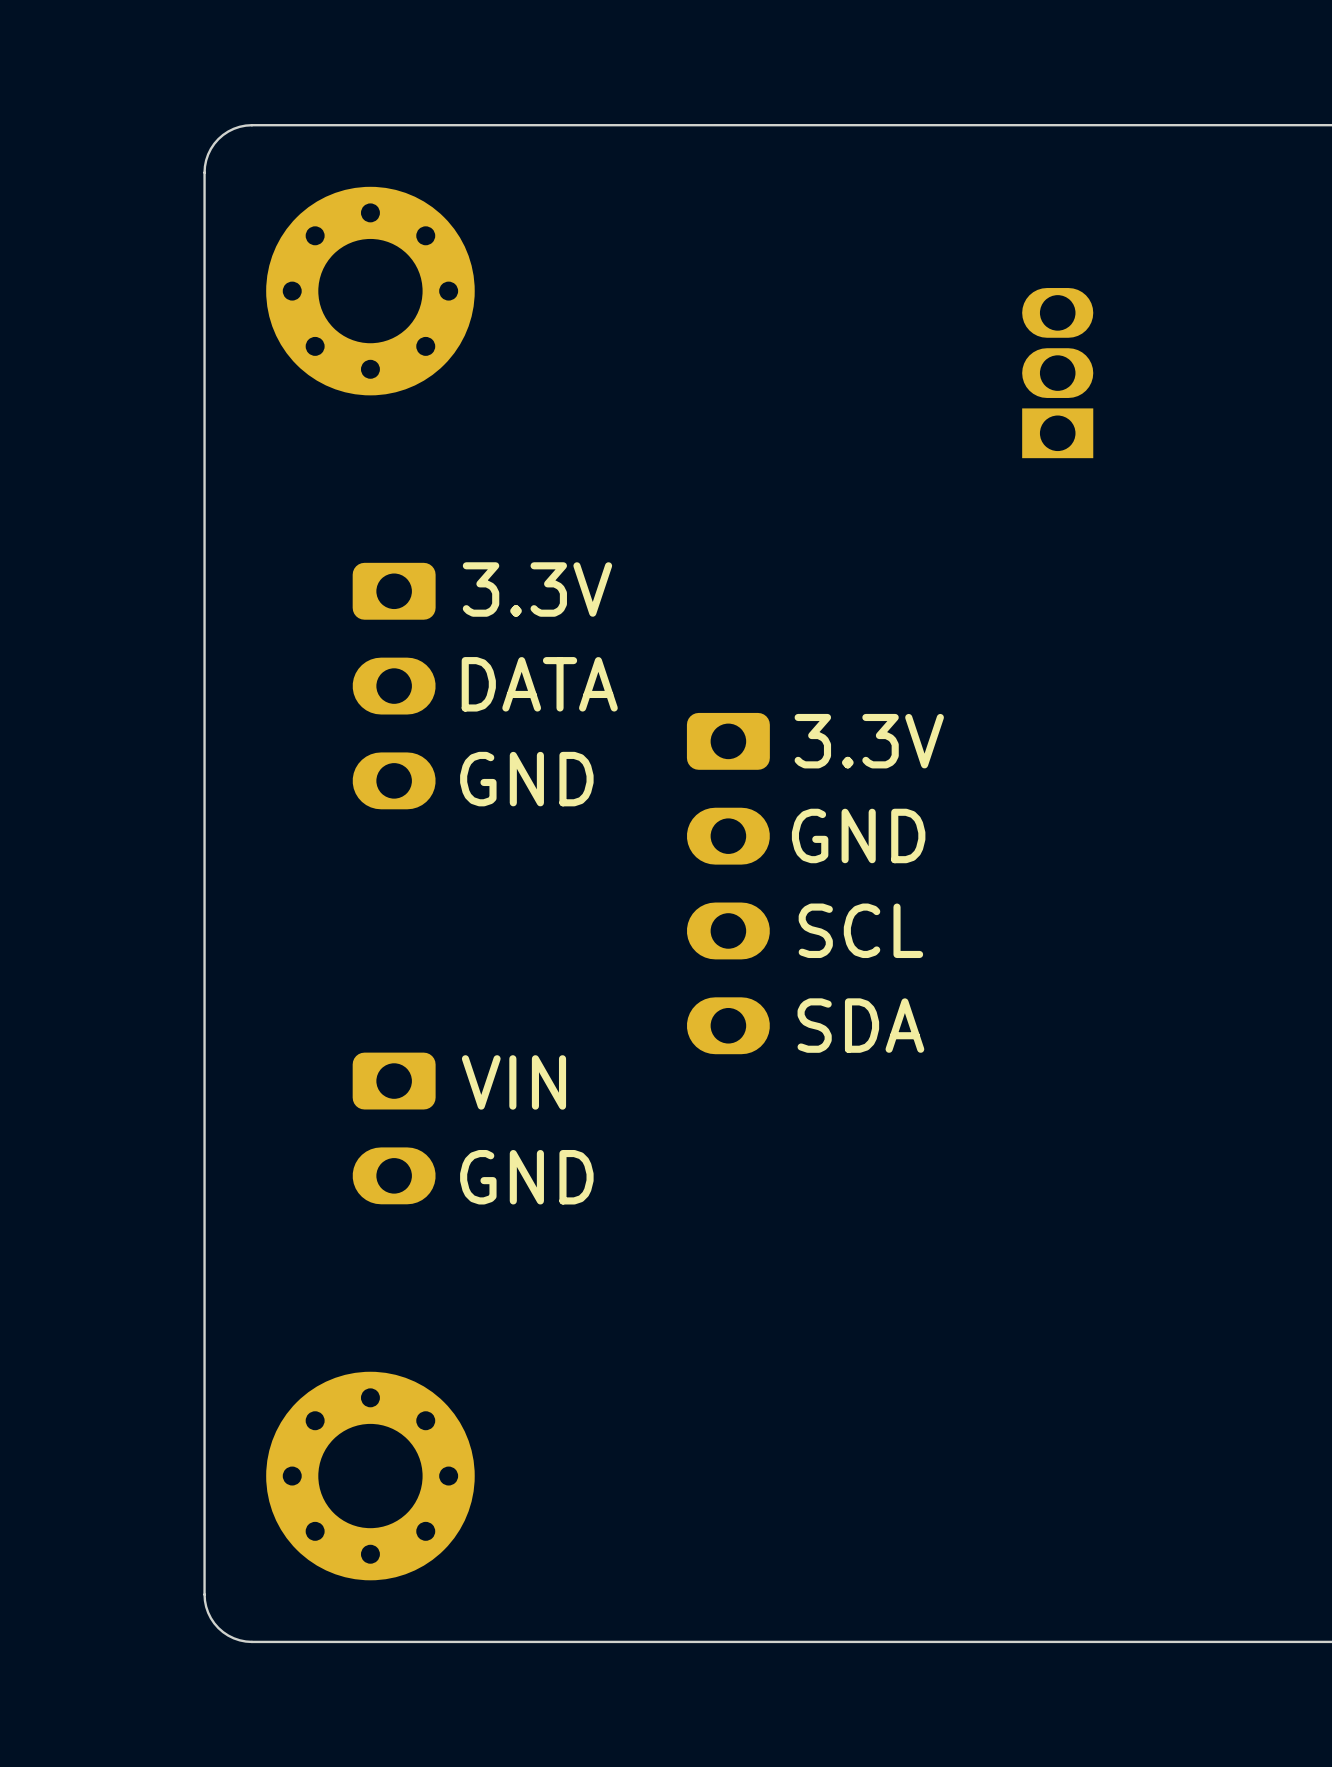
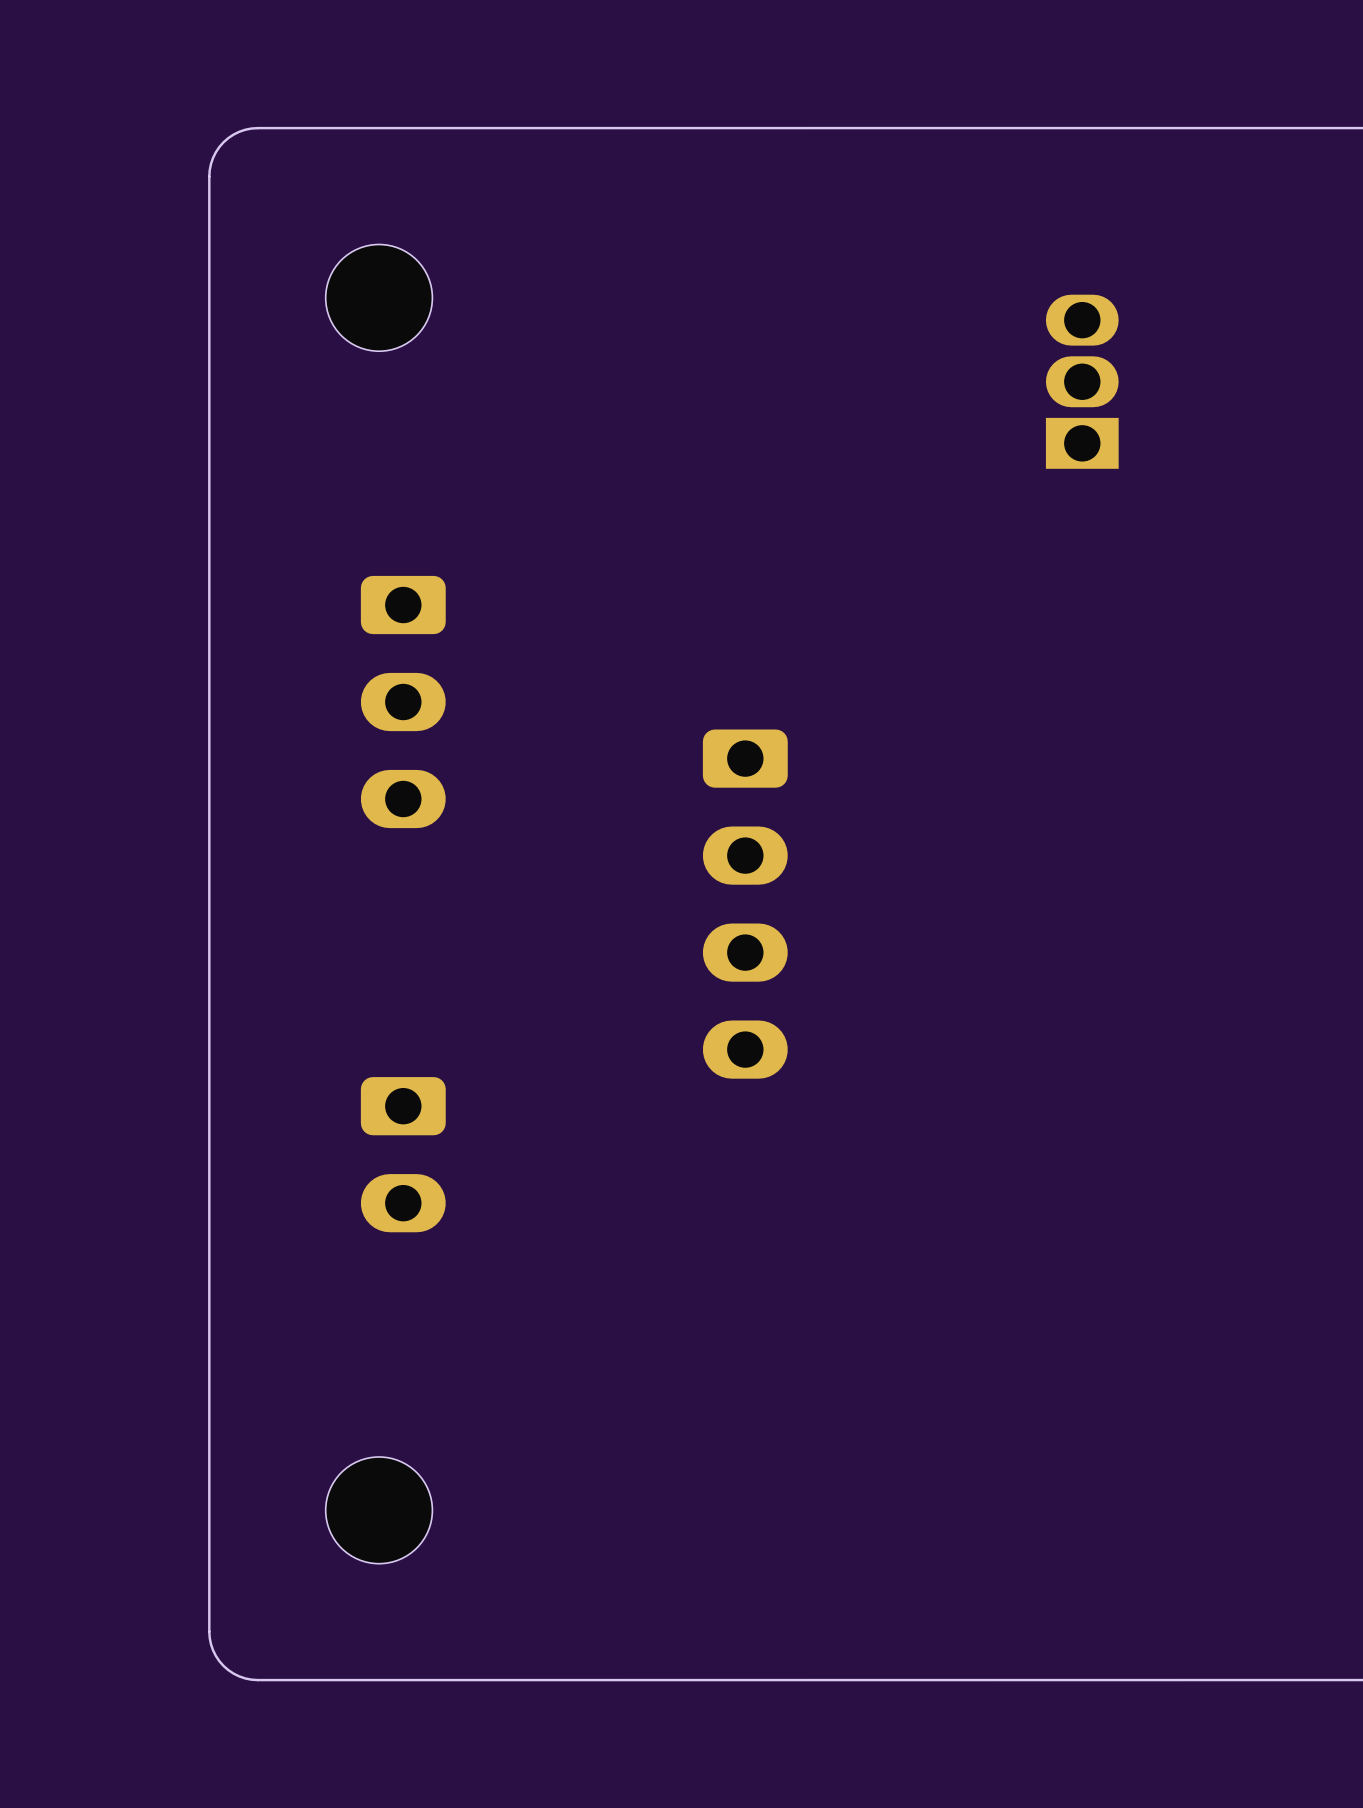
part footprint: [266, 186, 475, 396] -> [325, 244, 433, 352]
text: 3.3V (537, 589) -> none
text: DATA (539, 684) -> none
text: 3.3V (869, 741) -> none
text: GND (526, 779) -> none
text: GND (858, 835) -> none
text: SCL (860, 930) -> none
text: SDA (860, 1025) -> none
text: VIN (513, 1082) -> none
text: GND (526, 1177) -> none
part footprint: [266, 1371, 475, 1581] -> [325, 1456, 433, 1564]

